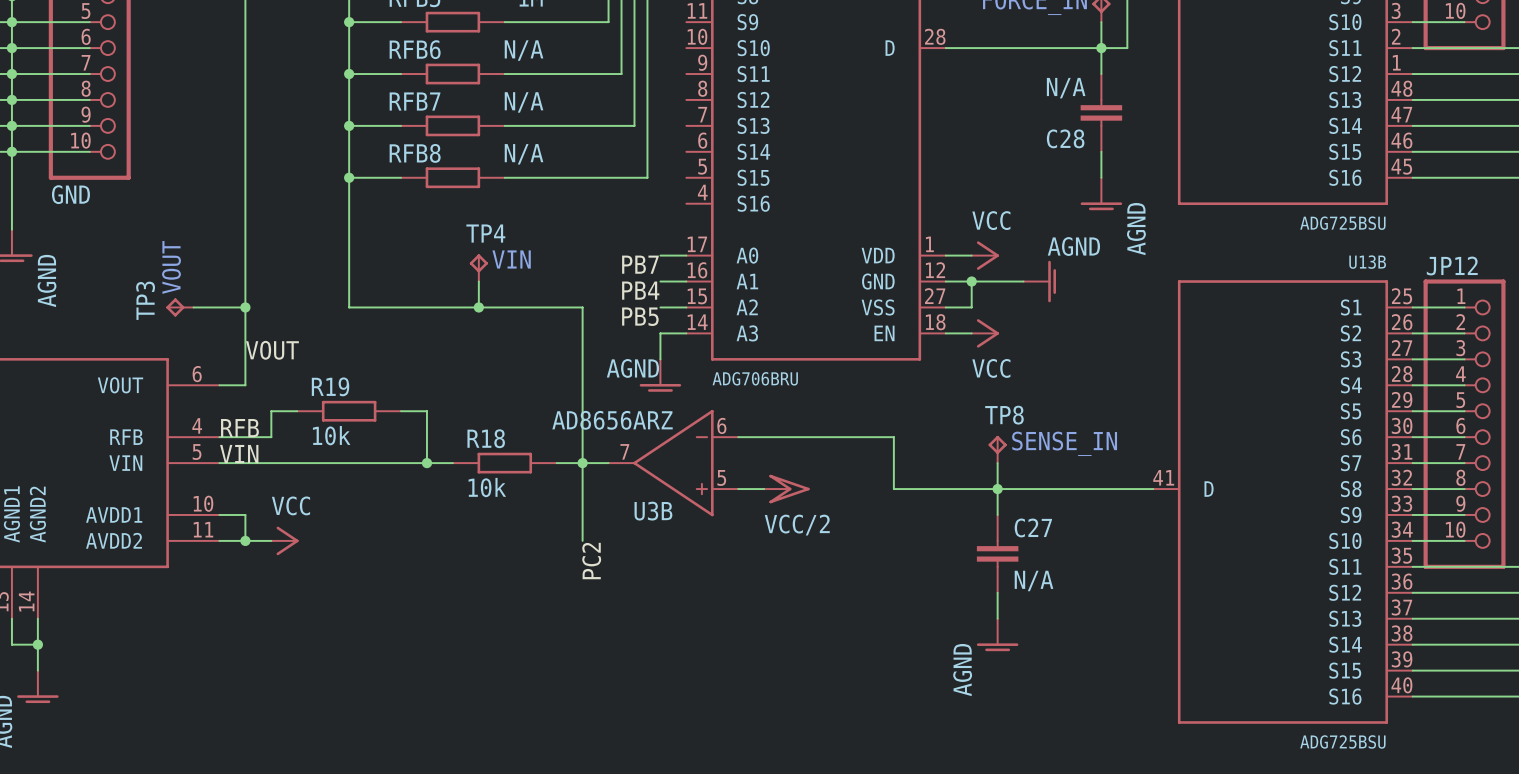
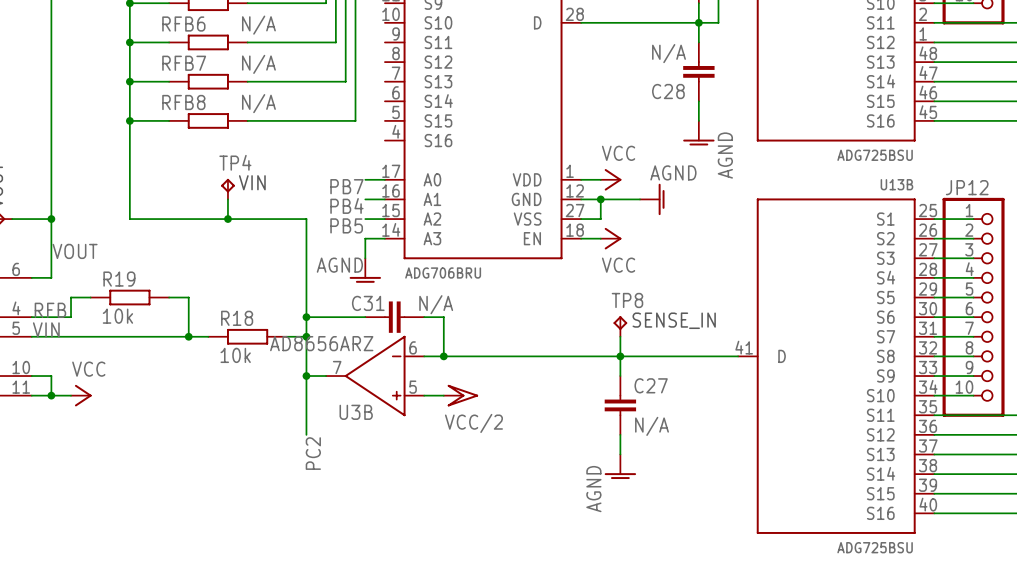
wire: none -> (306, 317) (365, 317)
junction: none -> (306, 317)
C31: none -> N/A (394, 317)
wire: (764, 437) (893, 437) (893, 489) -> (443, 317) (443, 356) (541, 356)
wire: (582, 463) (608, 463) -> (306, 376) (326, 376)
U3B position: (673, 463) -> (375, 376)
junction: none -> (443, 356)
power symbol position: VCC/2 (786, 489) -> VCC/2 (460, 395)
junction: none -> (306, 376)
wire: none -> (306, 395) (306, 434)
wire: none -> (424, 395) (443, 395)
label position: PC2 (591, 561) -> PC2 (313, 453)

